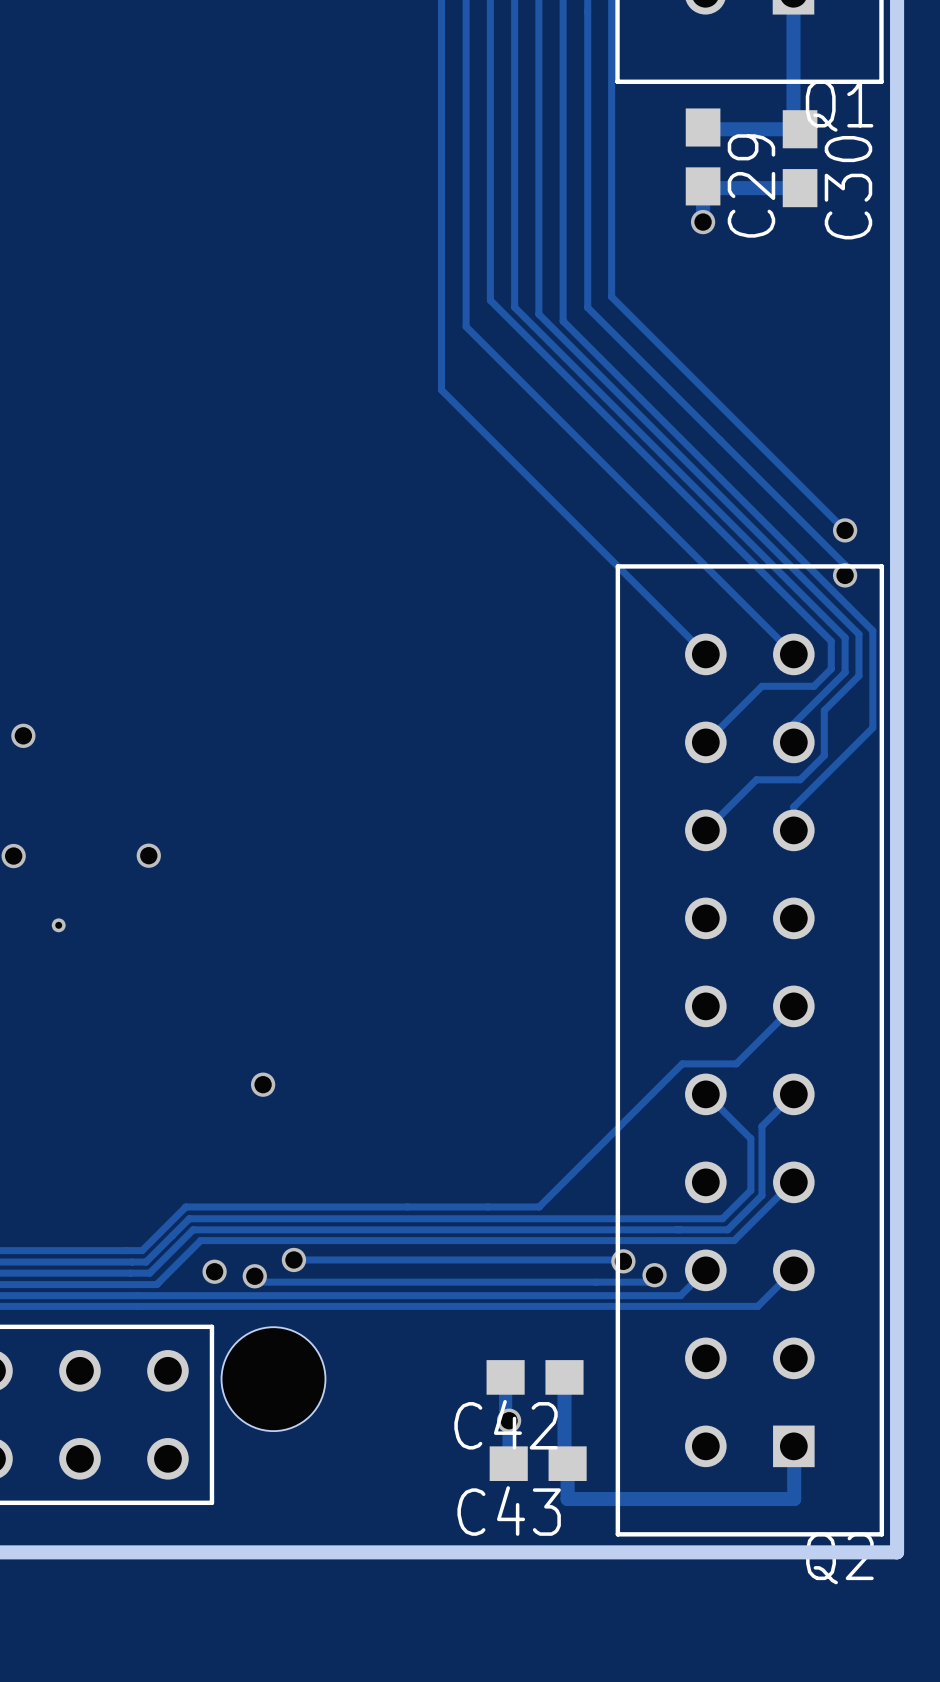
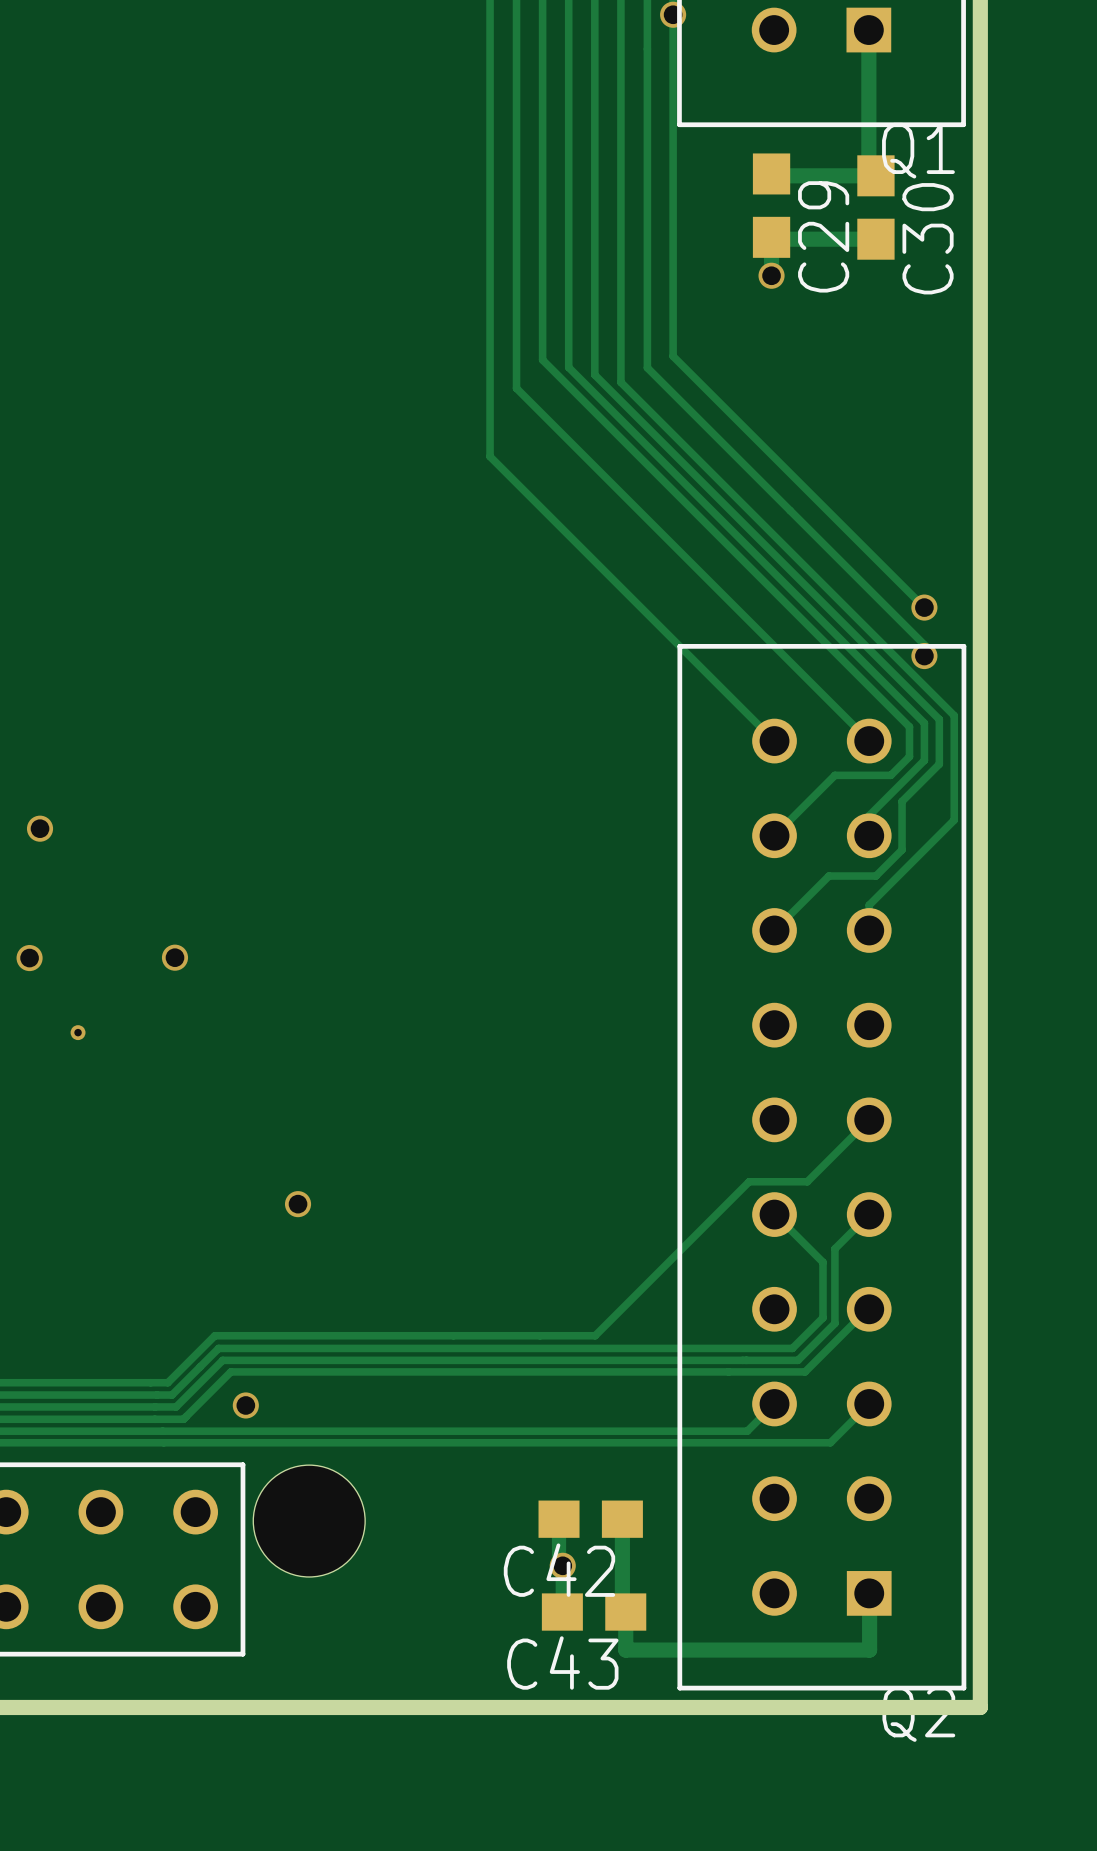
track: (293, 1259) (623, 1261) -> none
via: (293, 1259) -> none
via: (623, 1261) -> none
track: (654, 1275) (647, 1282) (260, 1282) (254, 1276) -> none
via: (654, 1275) -> none
via: (254, 1276) -> none

